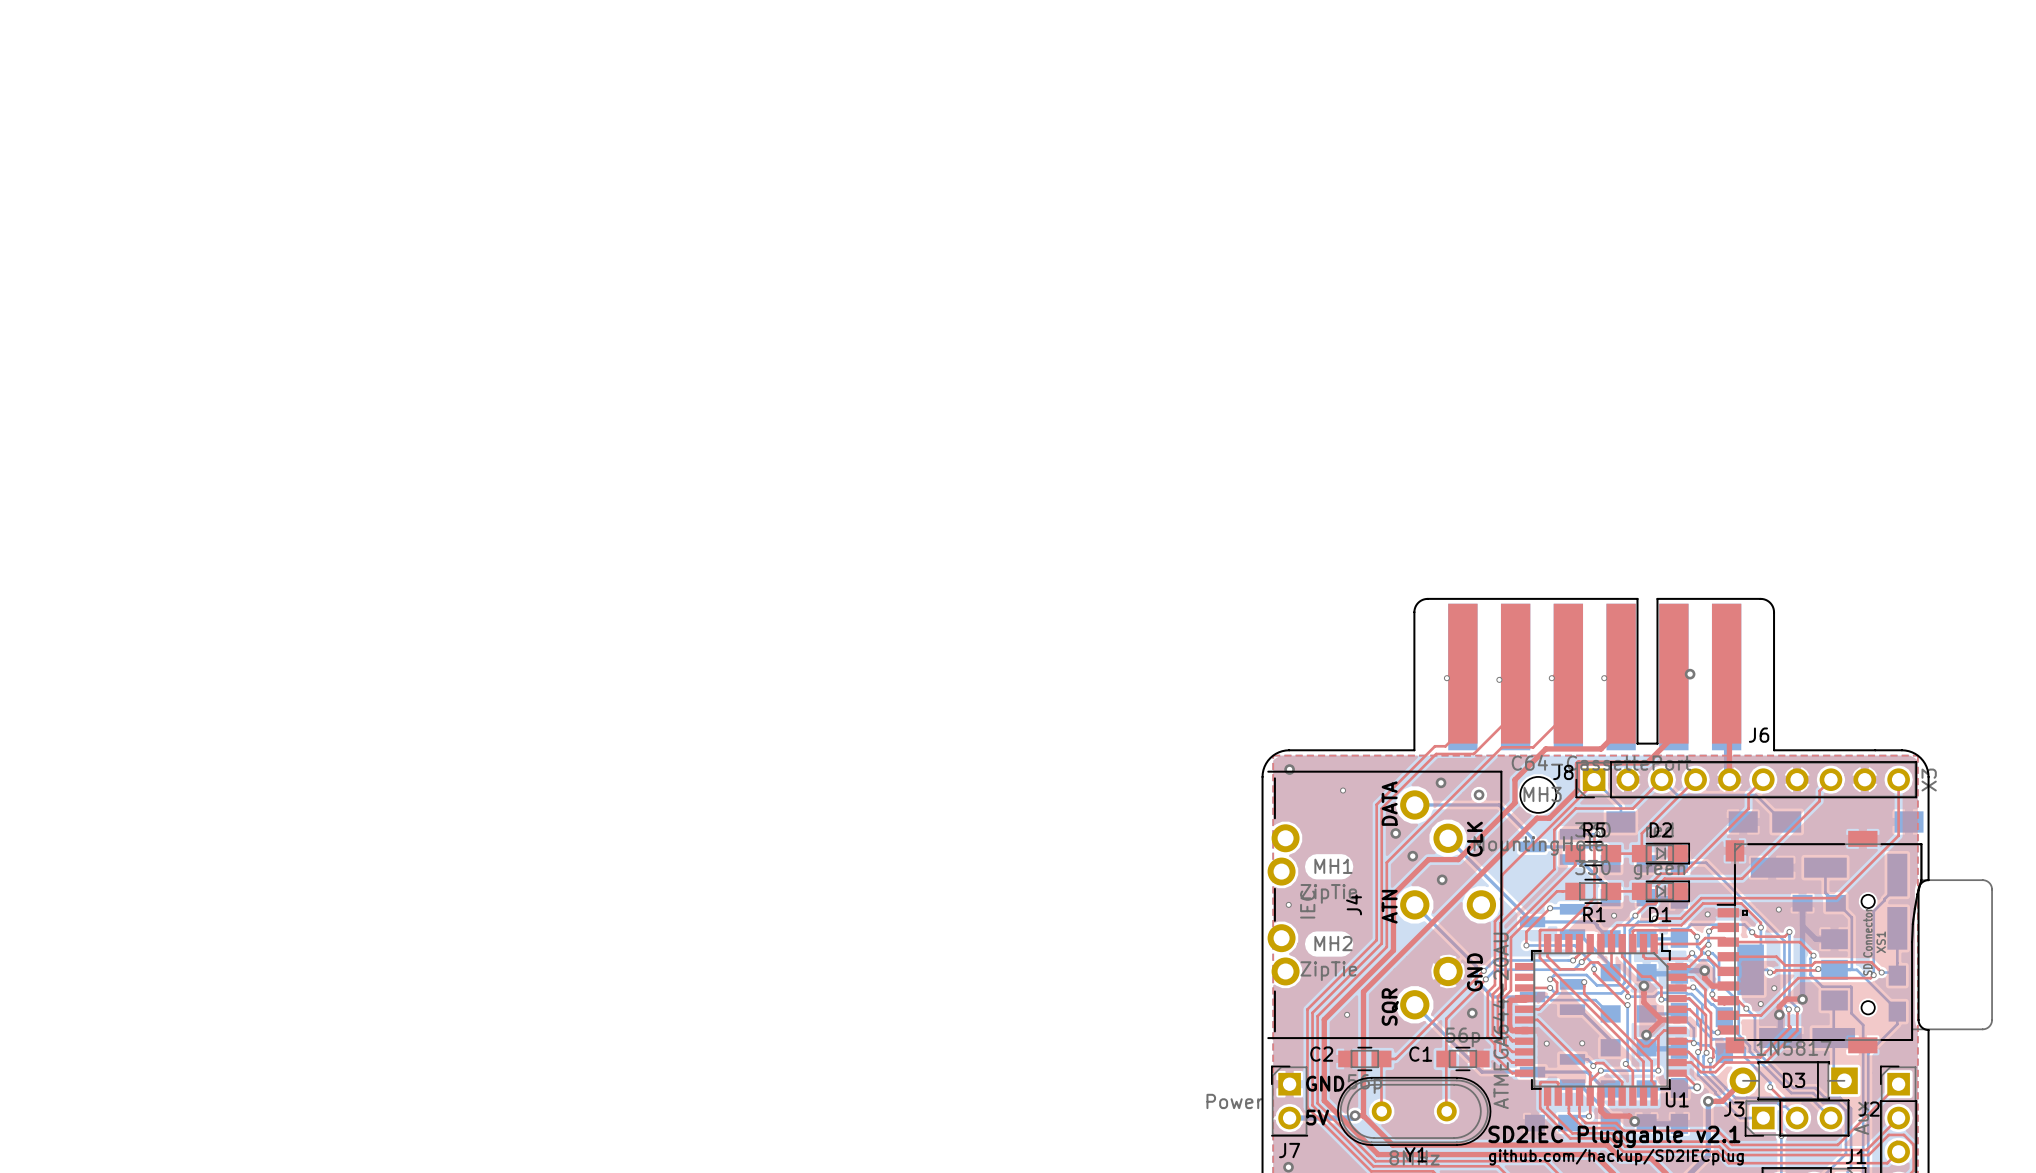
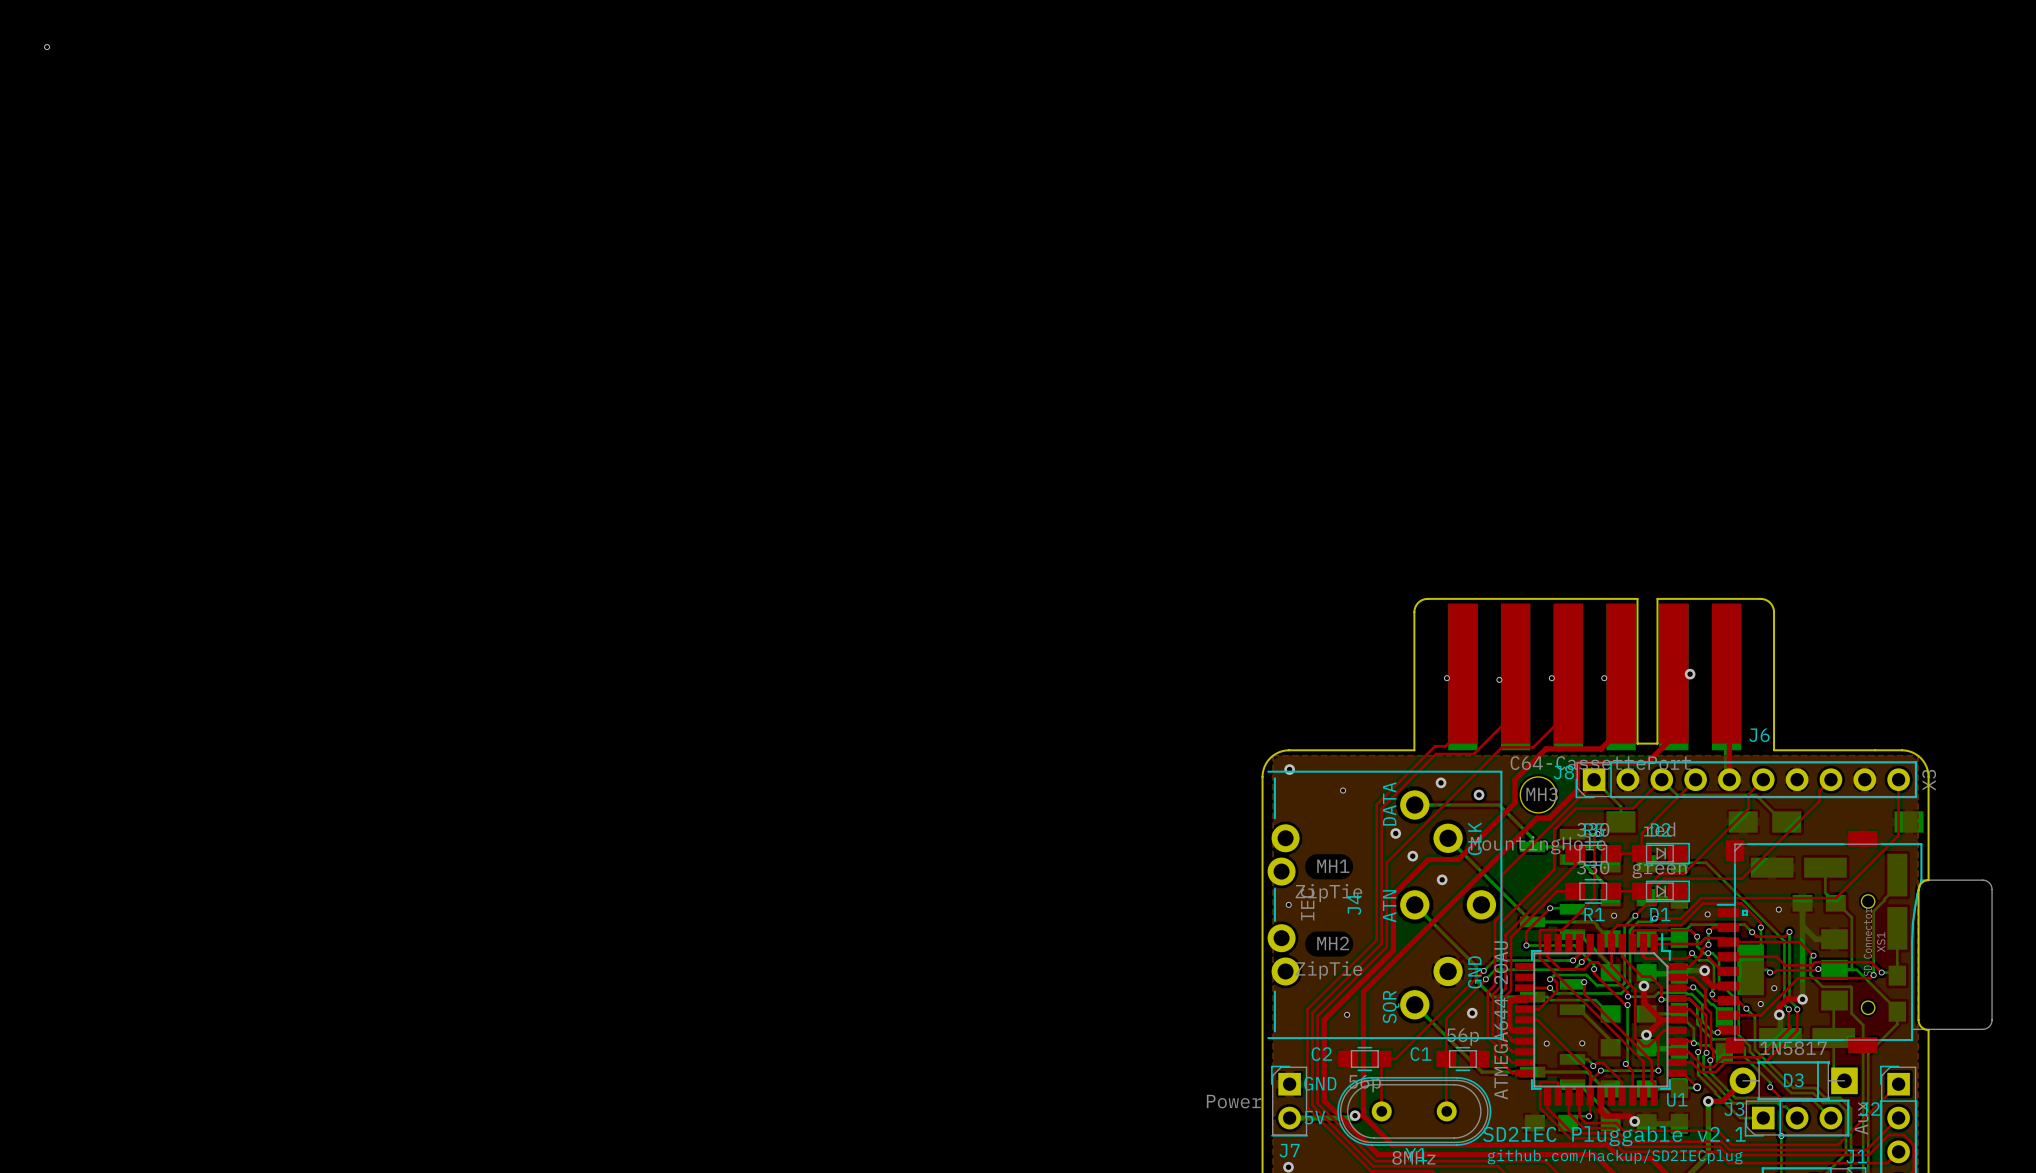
via: none -> (47, 47)

